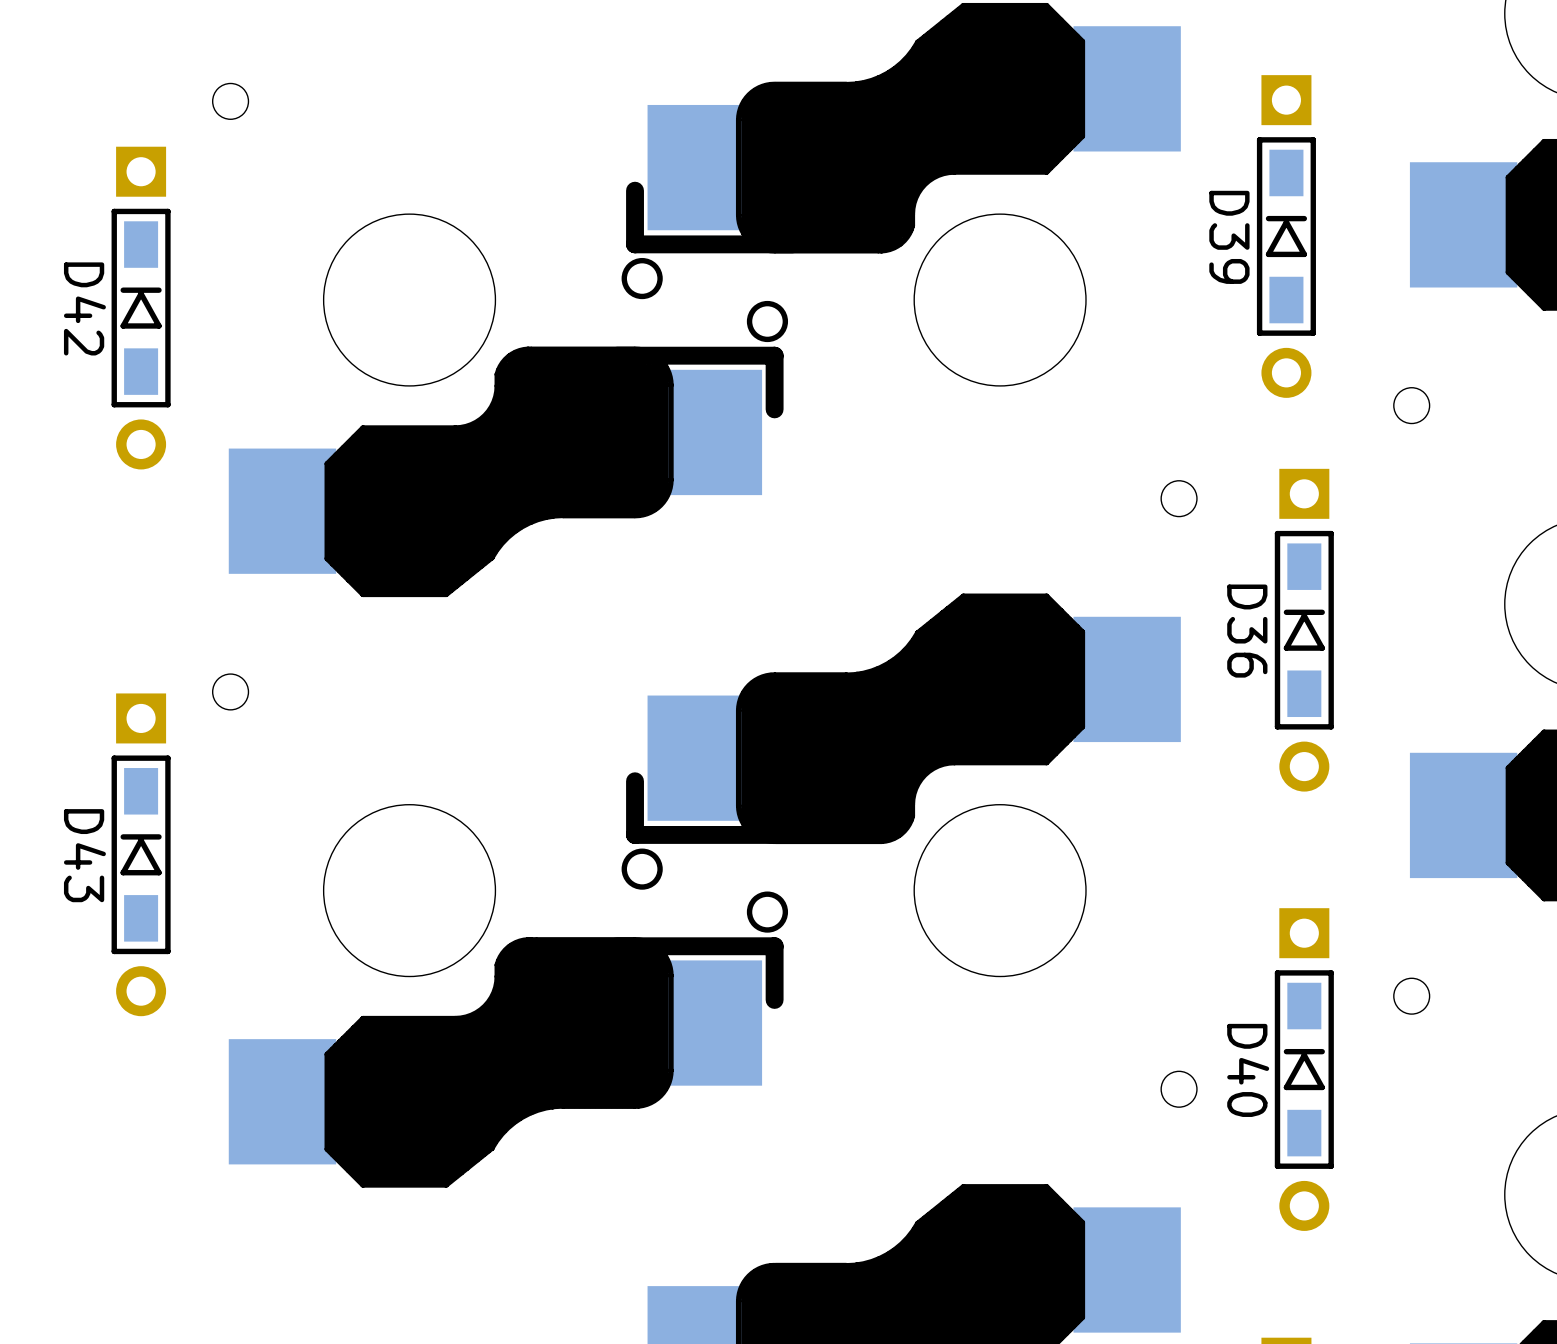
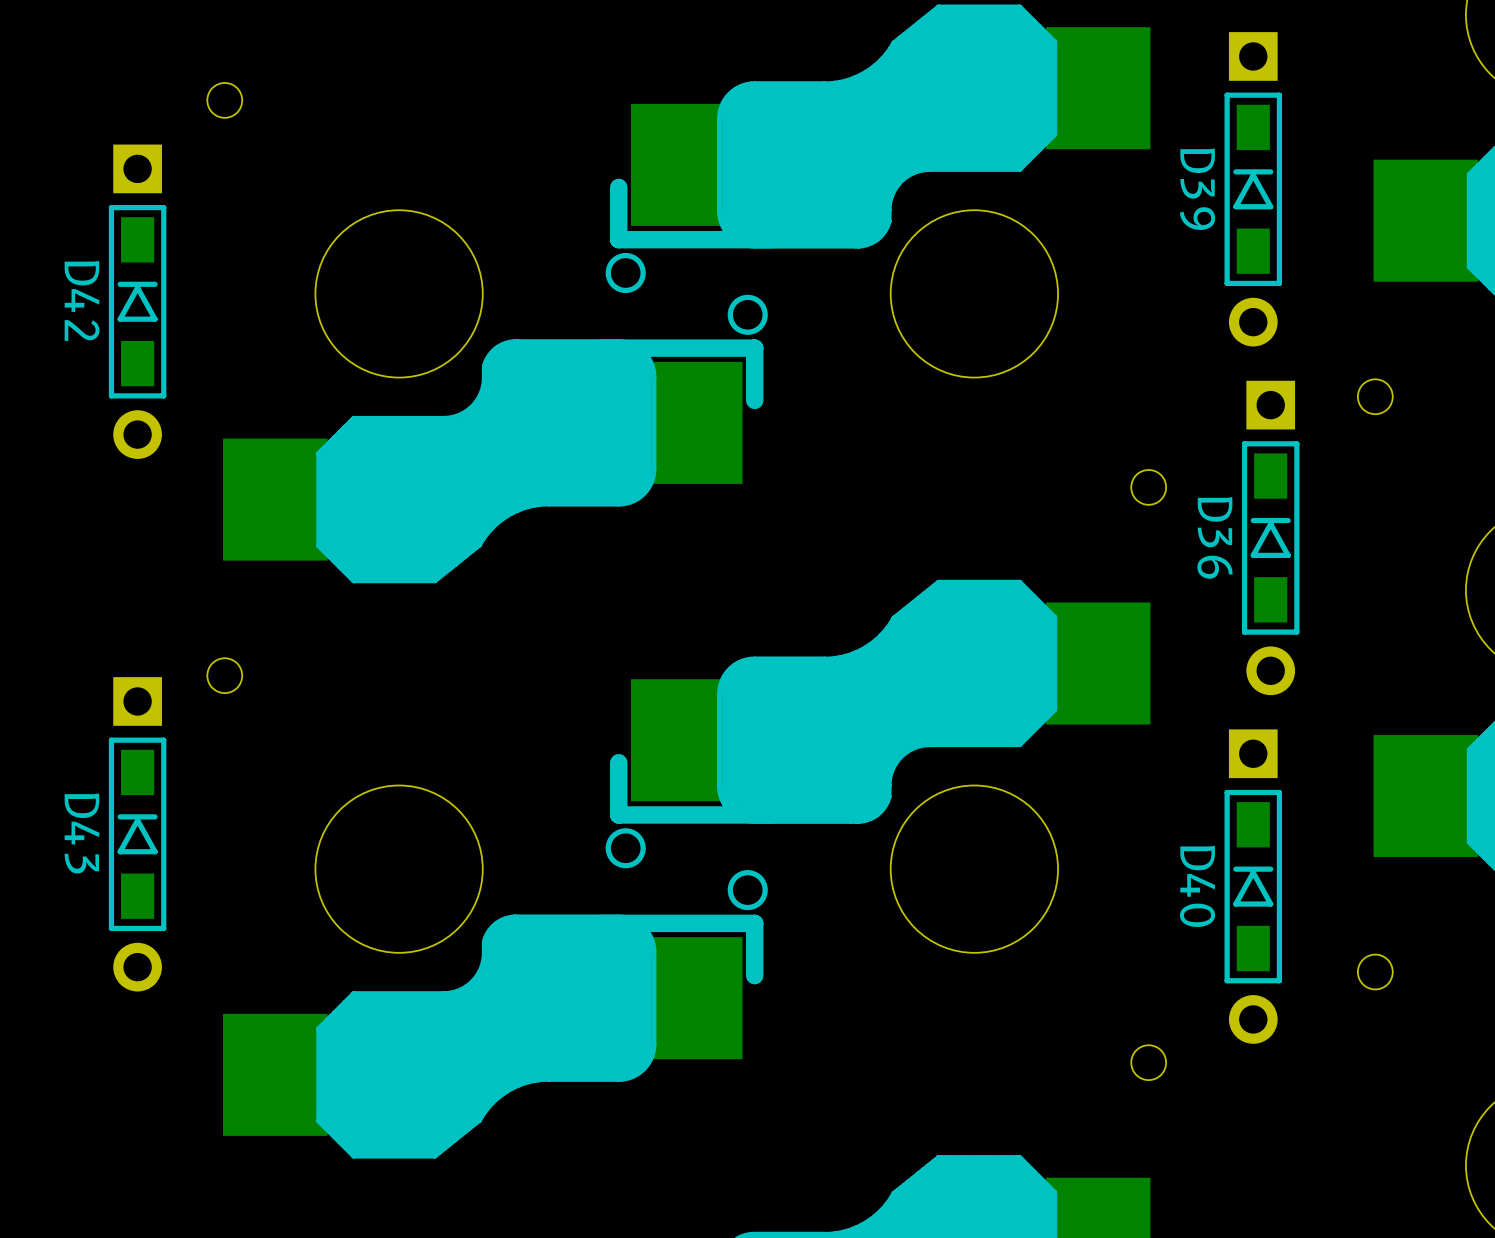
D39 position: (1286, 236) -> (1253, 189)
D36 position: (1304, 630) -> (1270, 537)
D40 position: (1304, 1069) -> (1253, 886)

